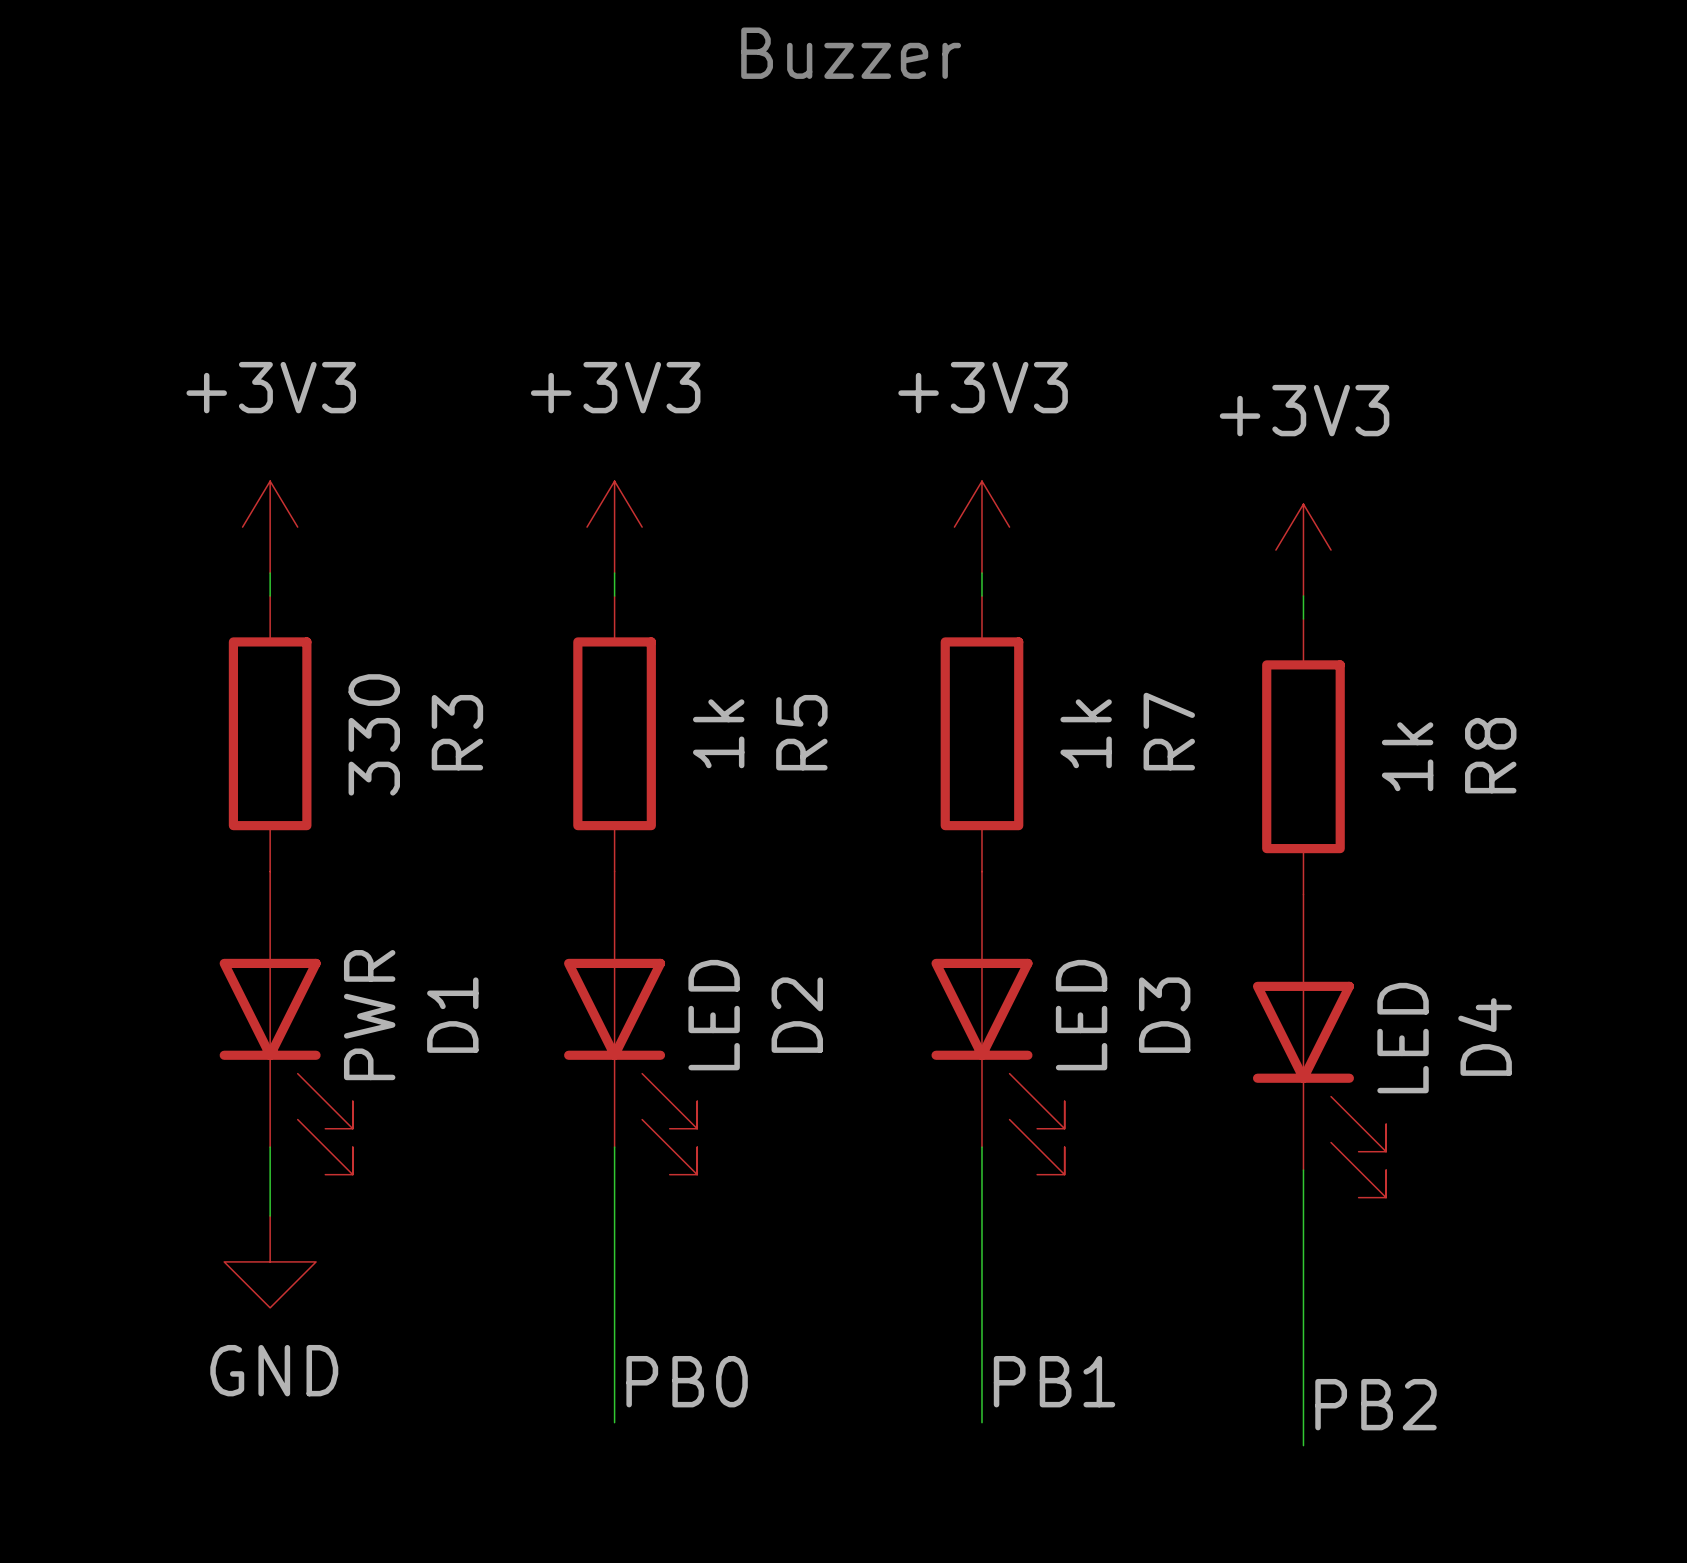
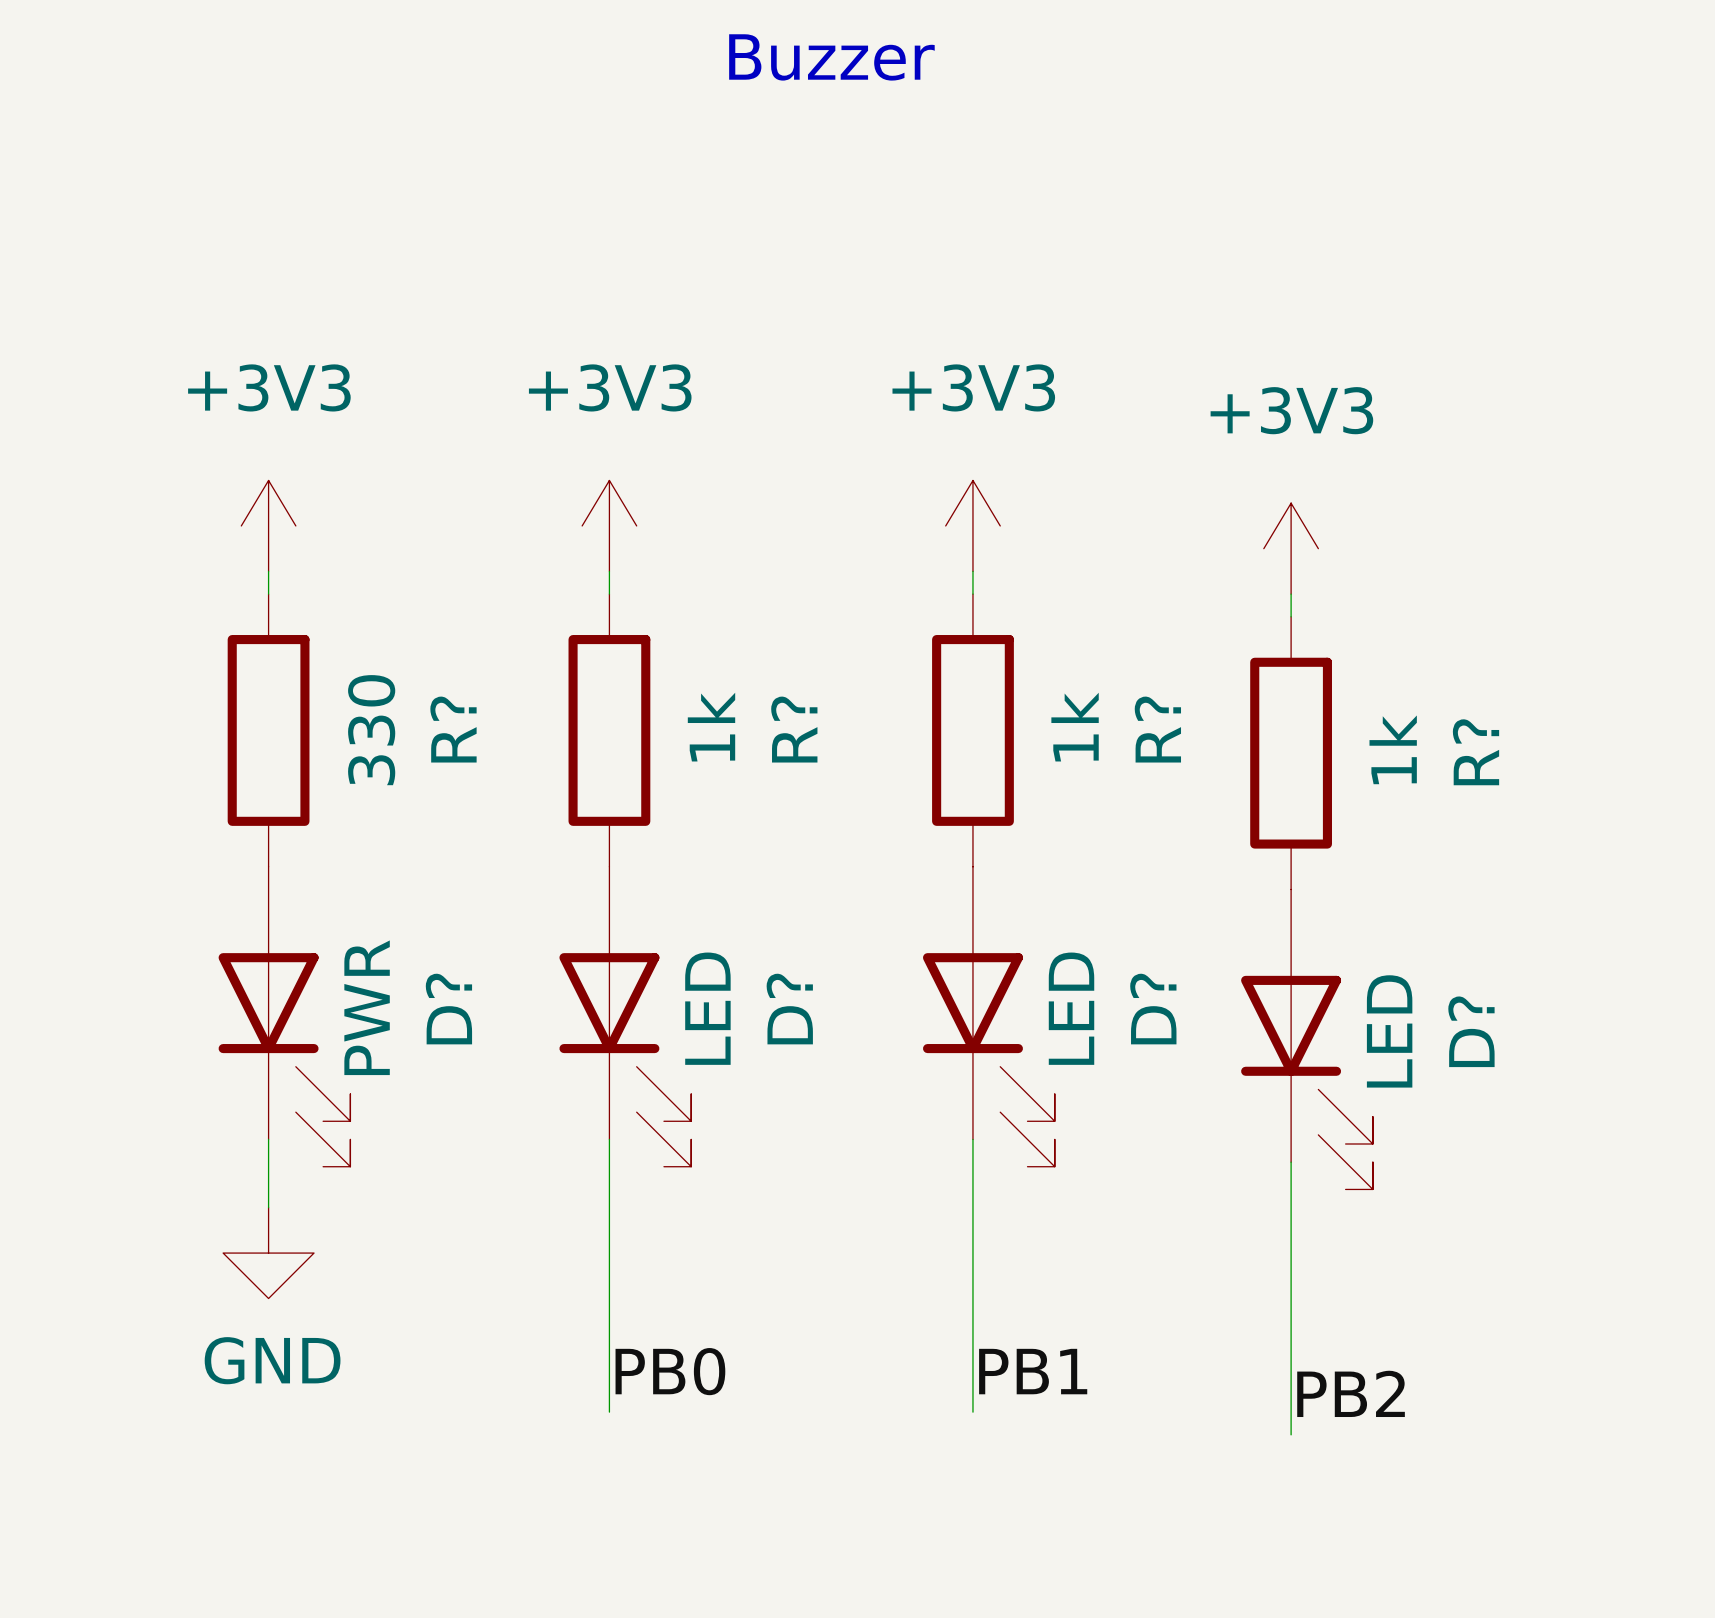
R7 name: R7 (1169, 731) -> R? (1157, 729)
R3 name: R3 (457, 732) -> R? (453, 729)
R5 name: R5 (801, 732) -> R? (794, 729)
R8 name: R8 (1490, 755) -> R? (1476, 752)
D1 name: D1 (452, 1015) -> D? (448, 1009)
D2 name: D2 (797, 1015) -> D? (789, 1009)
D3 name: D3 (1164, 1015) -> D? (1153, 1009)
D4 name: D4 (1485, 1037) -> D? (1471, 1031)

